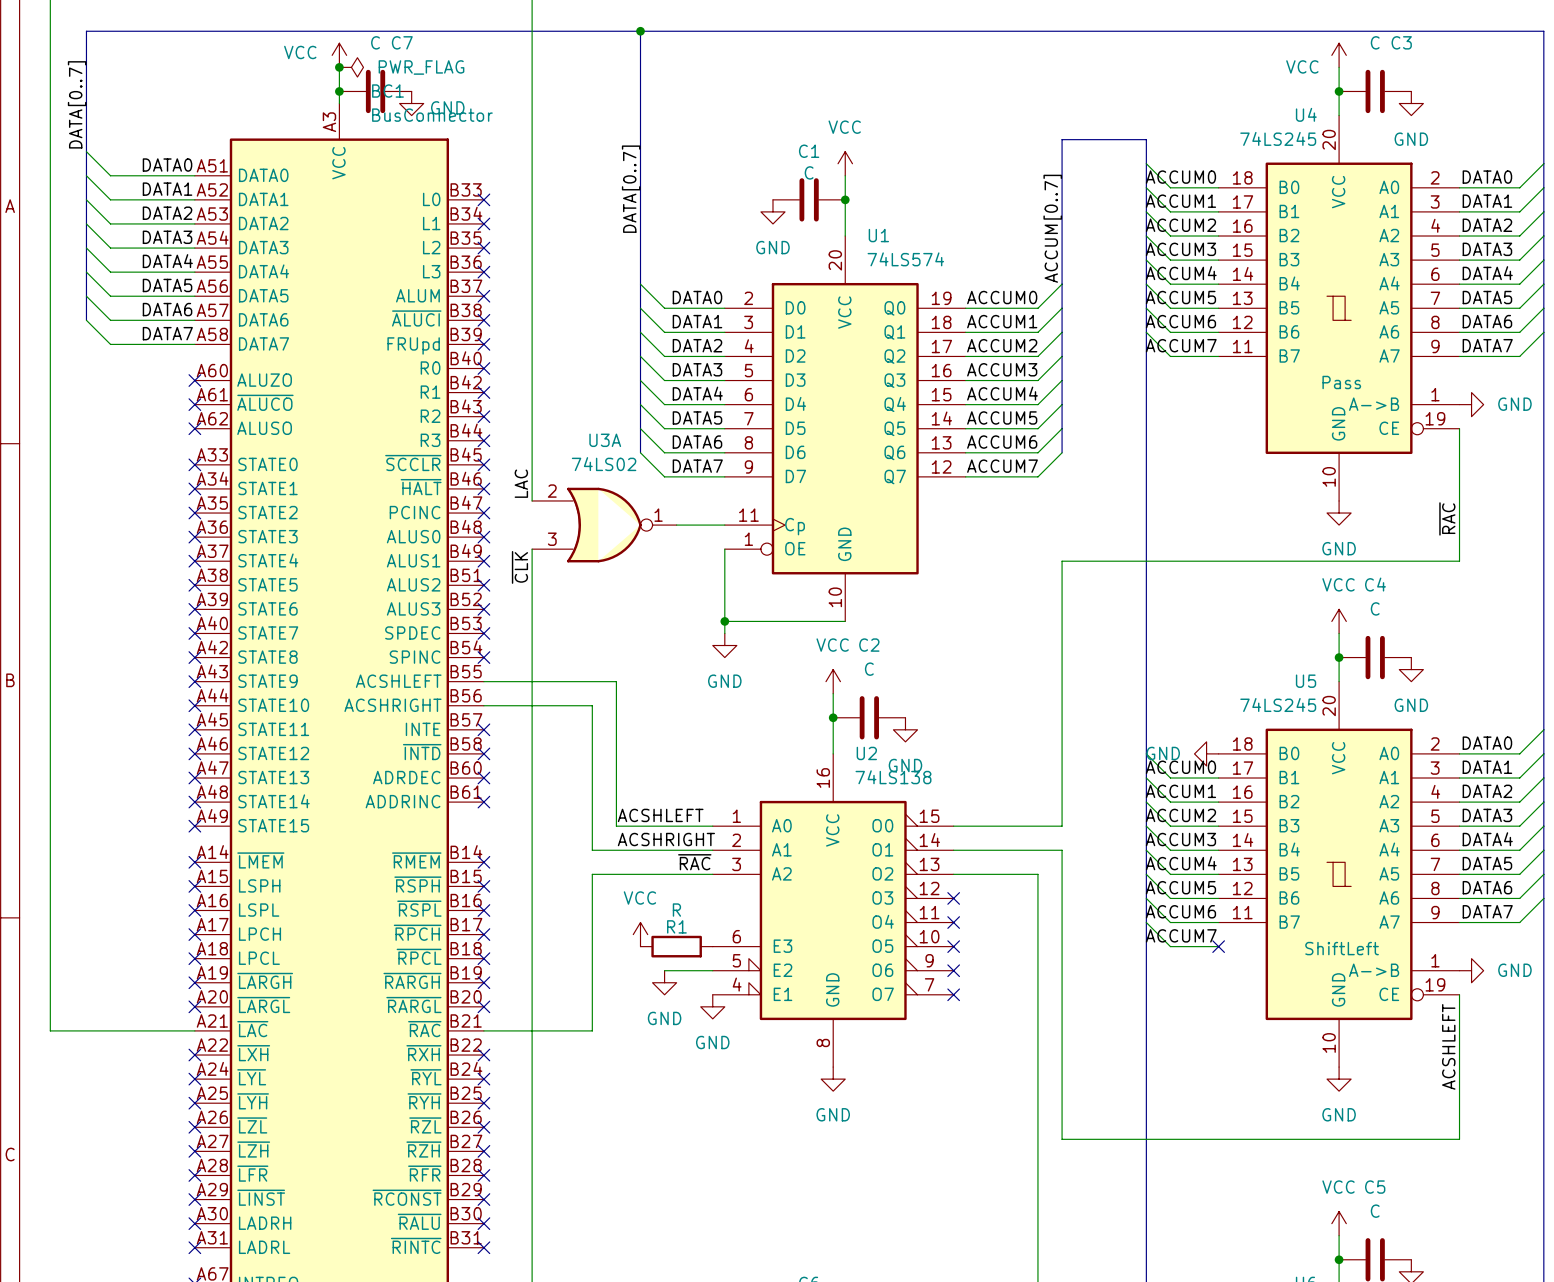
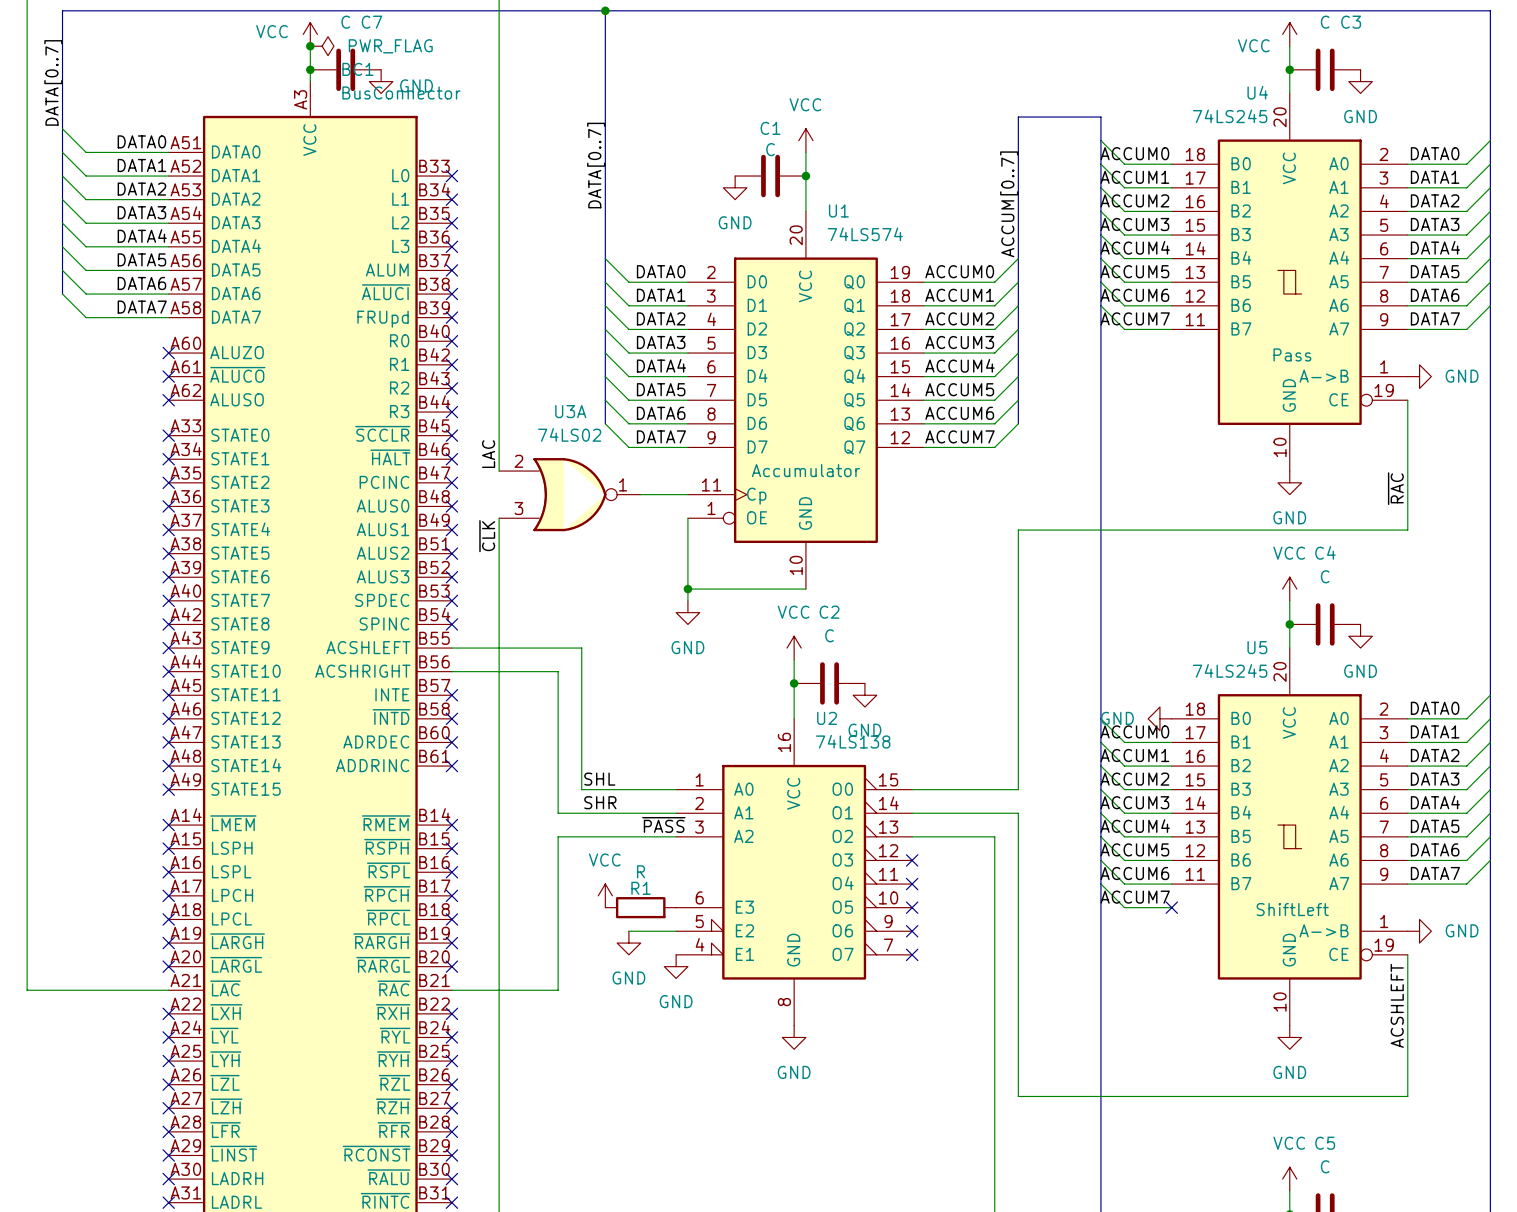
U1 text: none -> Accumulator (805, 470)
label: ACSHLEFT (660, 815) -> SHL (599, 779)
label: ACSHRIGHT (666, 839) -> SHR (600, 802)
label: ~{RAC} (694, 862) -> ~{PASS} (663, 824)

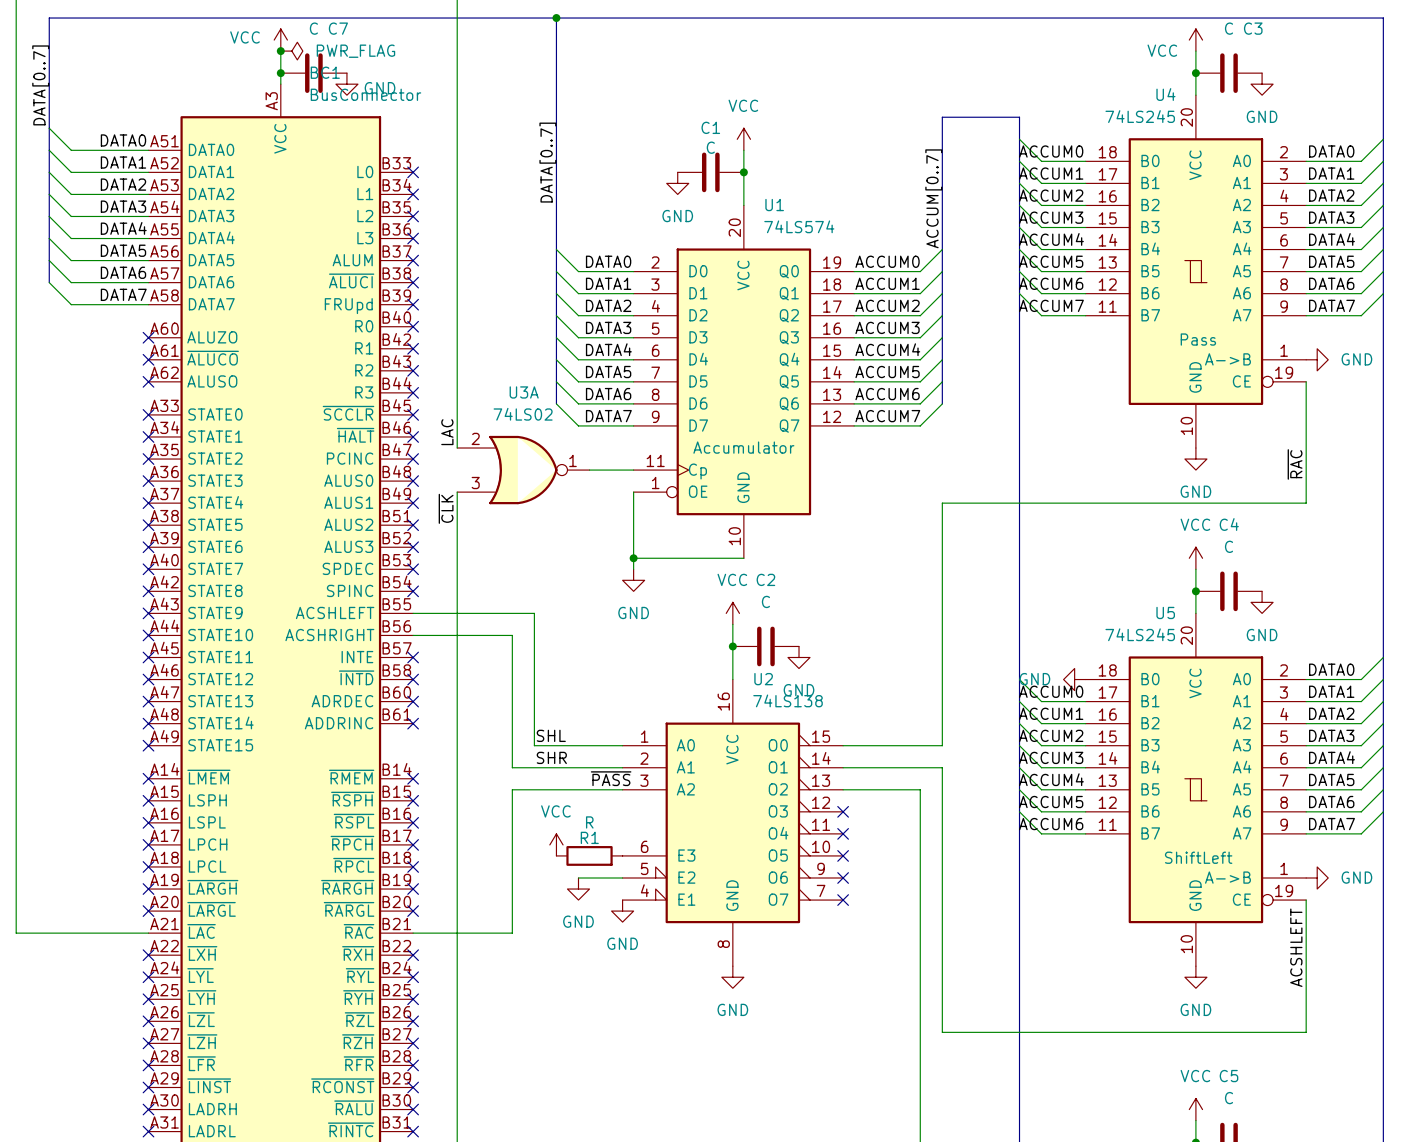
wire: (1100, 884) (1124, 907) (1171, 907) -> none
label: ACCUM7 (1135, 897) -> none
no-connect mark: (1171, 907) -> none

